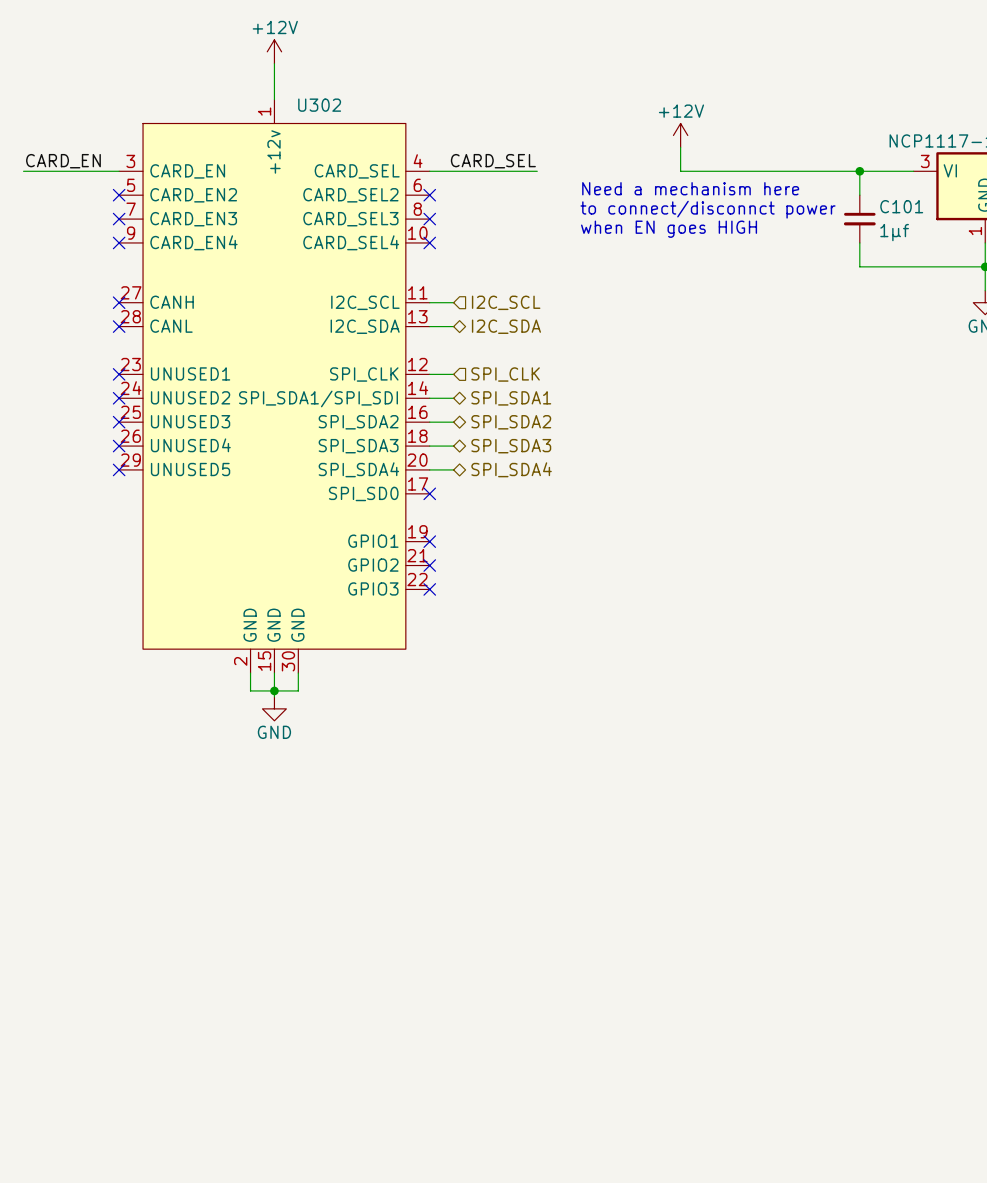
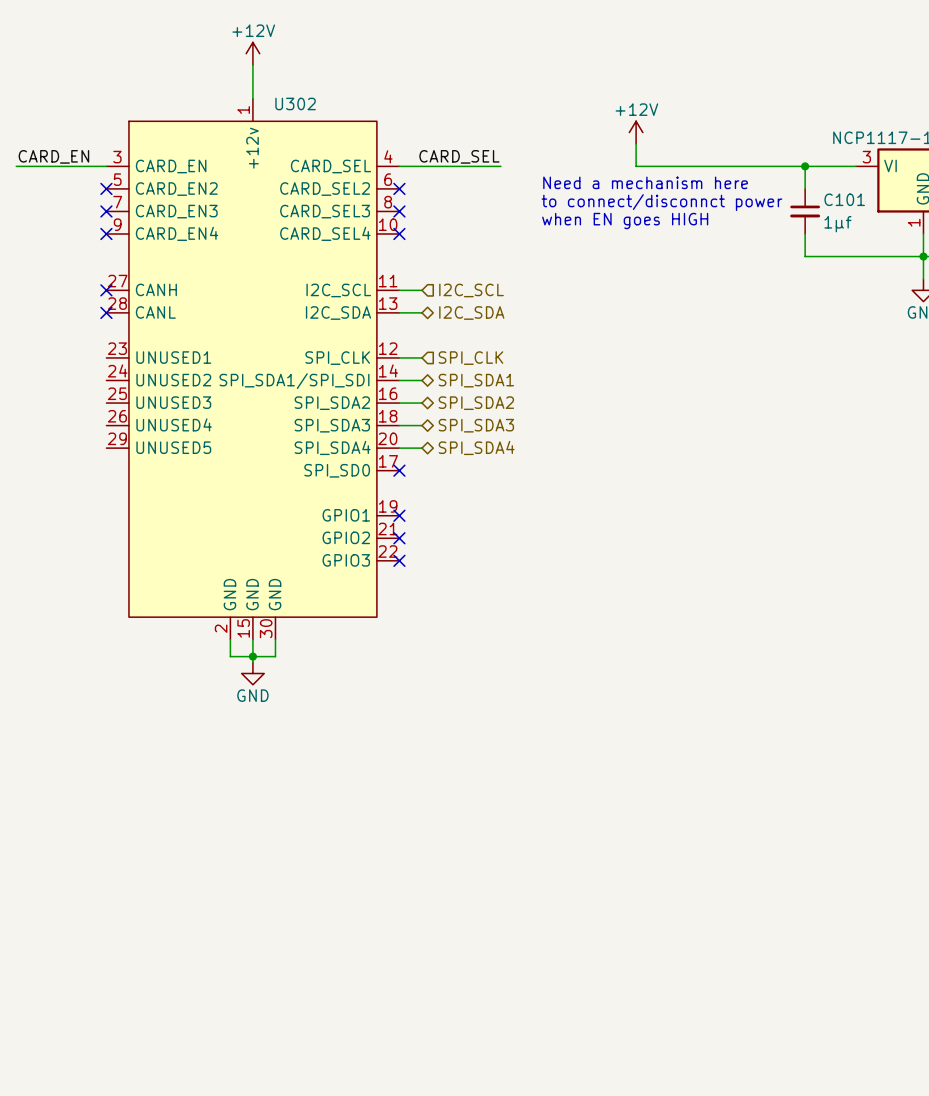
no-connect mark: (119, 374) -> none
no-connect mark: (119, 398) -> none
no-connect mark: (119, 422) -> none
no-connect mark: (119, 446) -> none
no-connect mark: (119, 469) -> none

